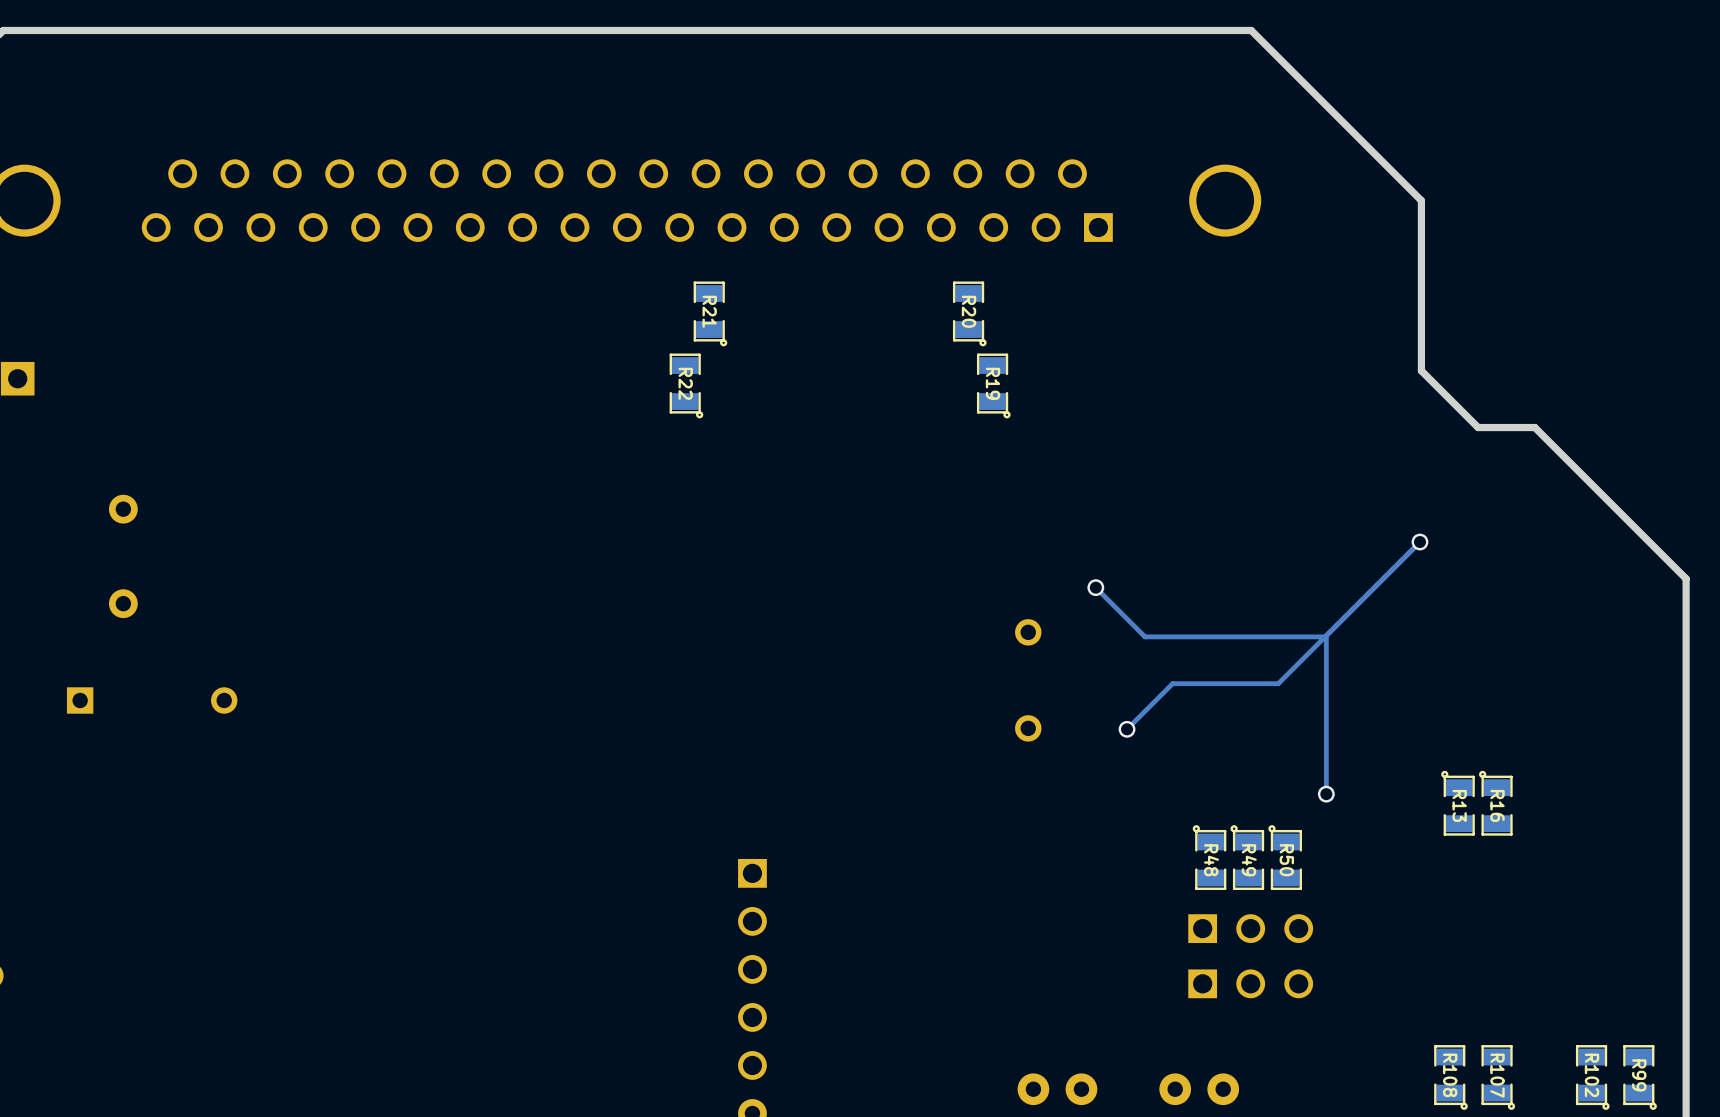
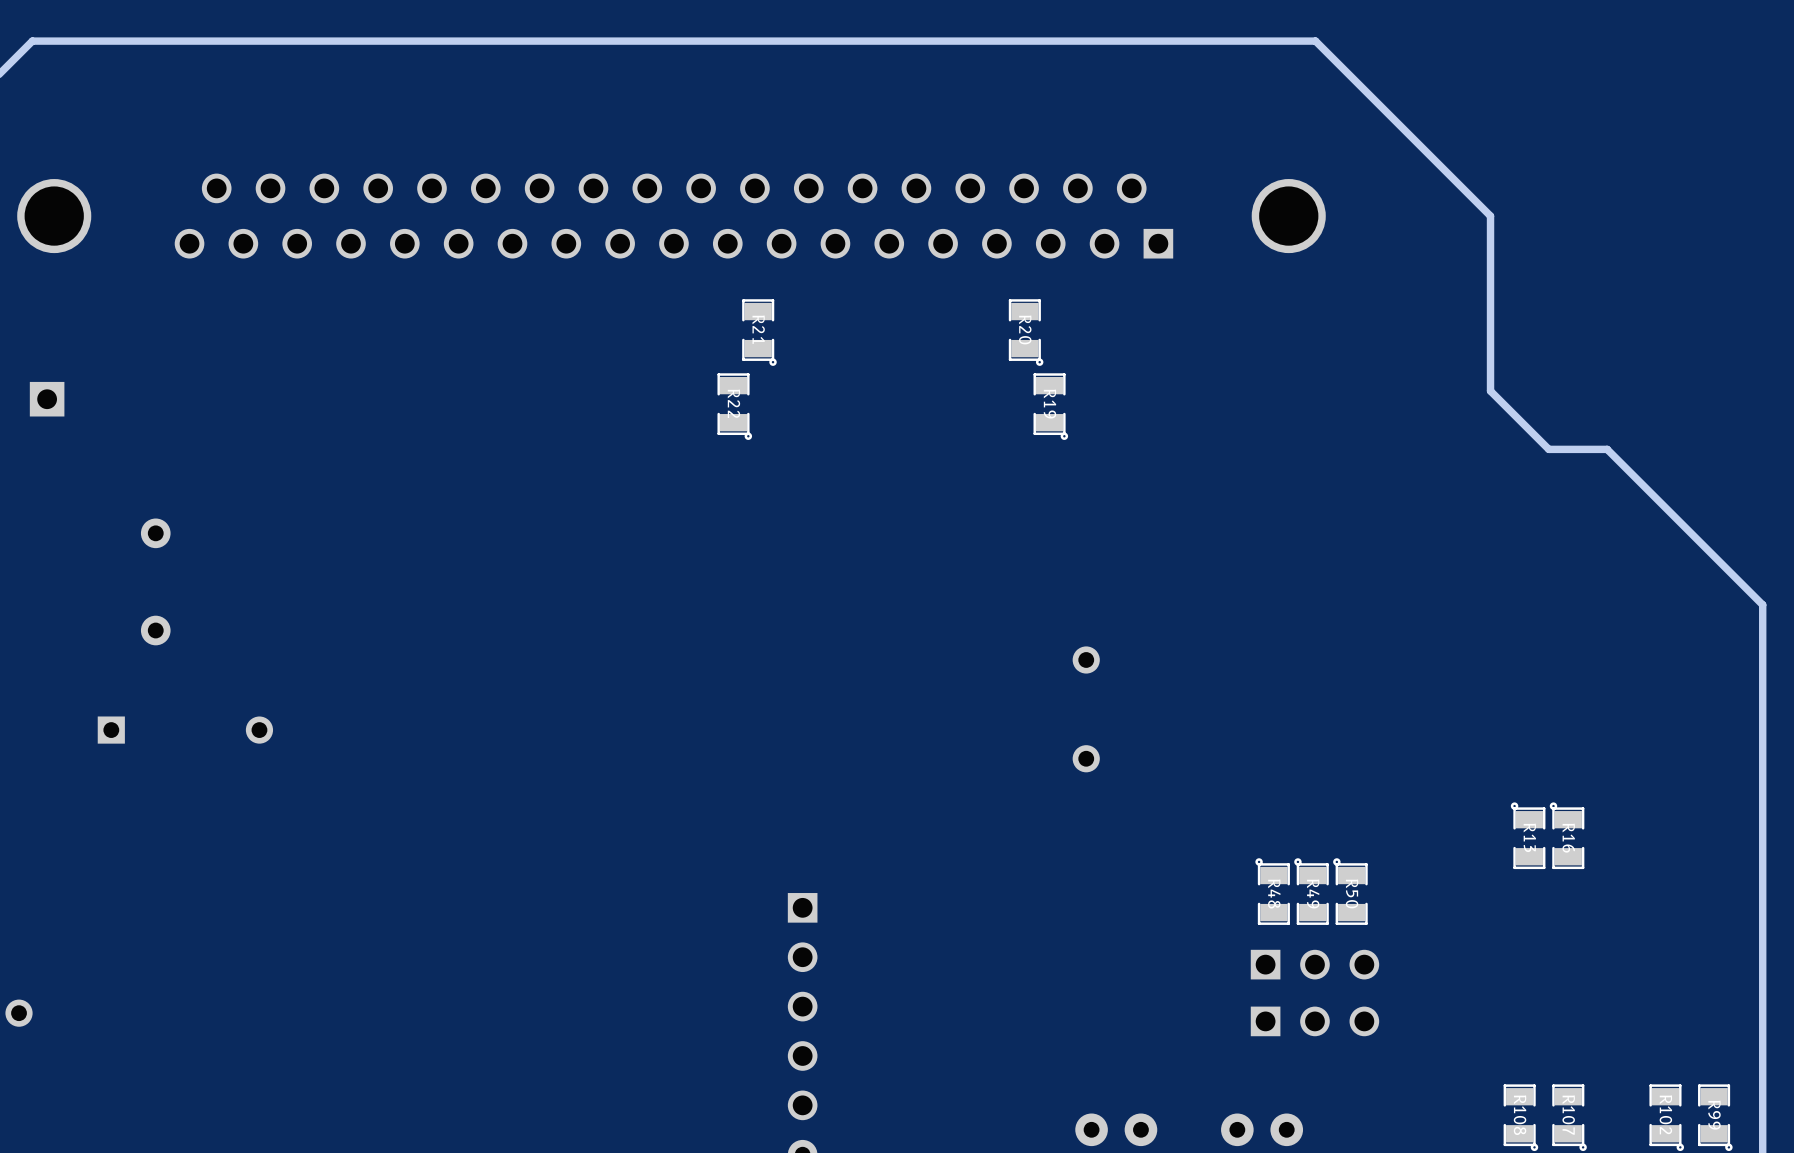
track: (1419, 542) (1278, 683) (1172, 683) (1127, 729) -> none
via: (1419, 542) -> none
track: (1095, 587) (1145, 636) (1325, 636) -> none
via: (1095, 587) -> none
track: (1326, 635) (1326, 794) -> none
via: (1127, 729) -> none
via: (1326, 794) -> none

